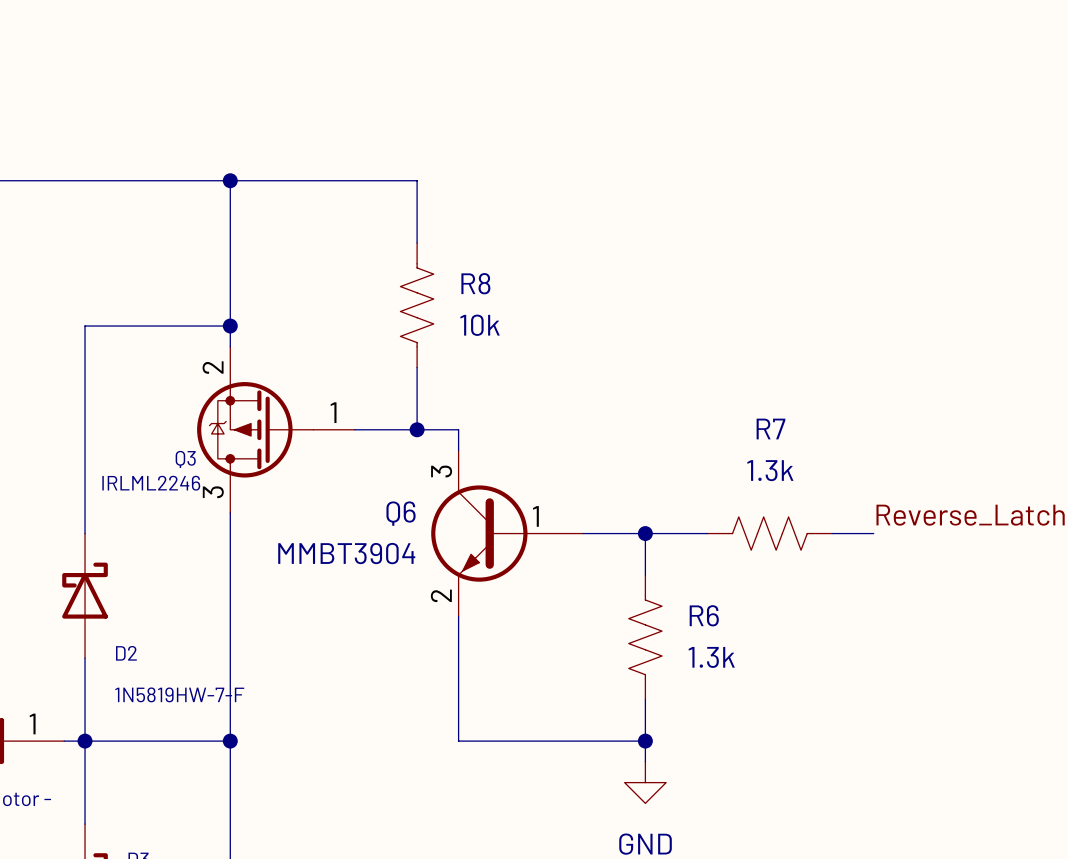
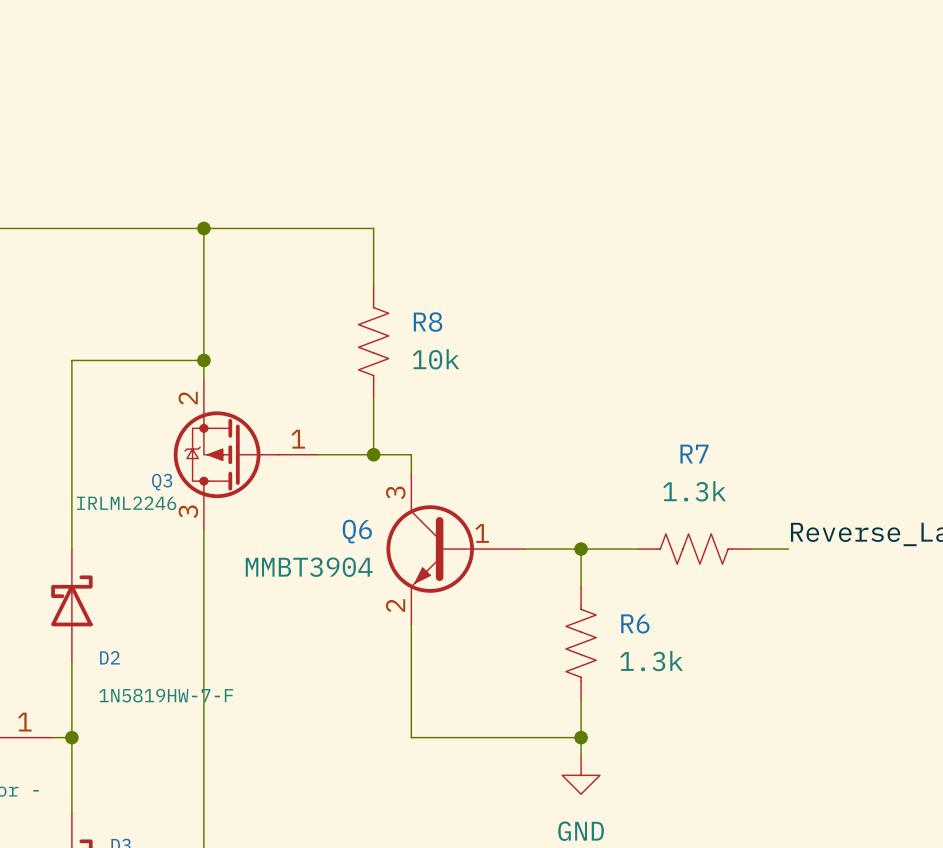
wire: (85, 741) (230, 741) -> none
junction: (230, 741) -> none

